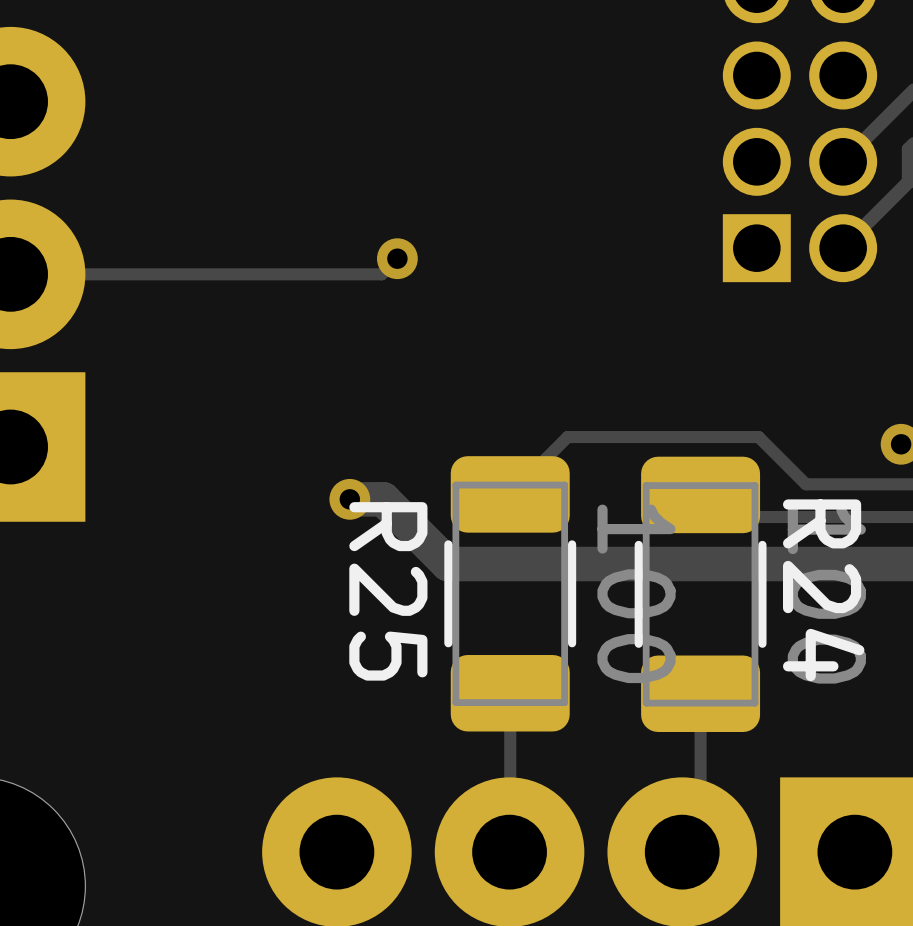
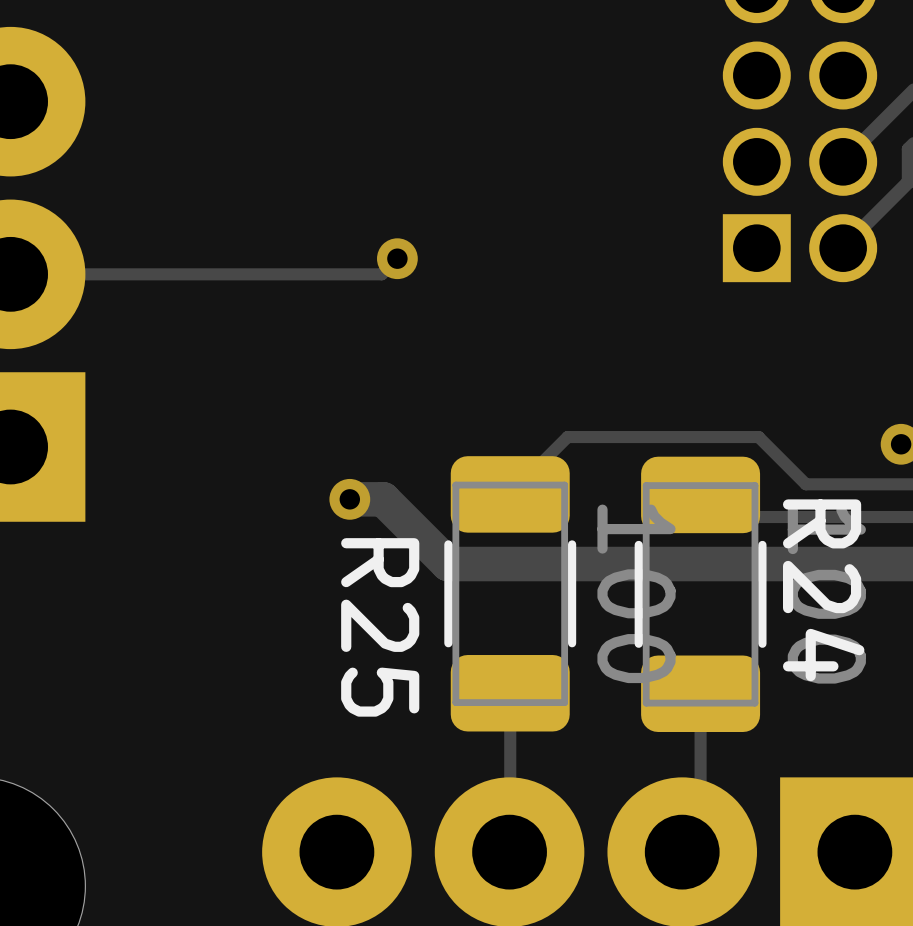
R25 name position: R25 (388, 591) -> R25 (380, 627)

